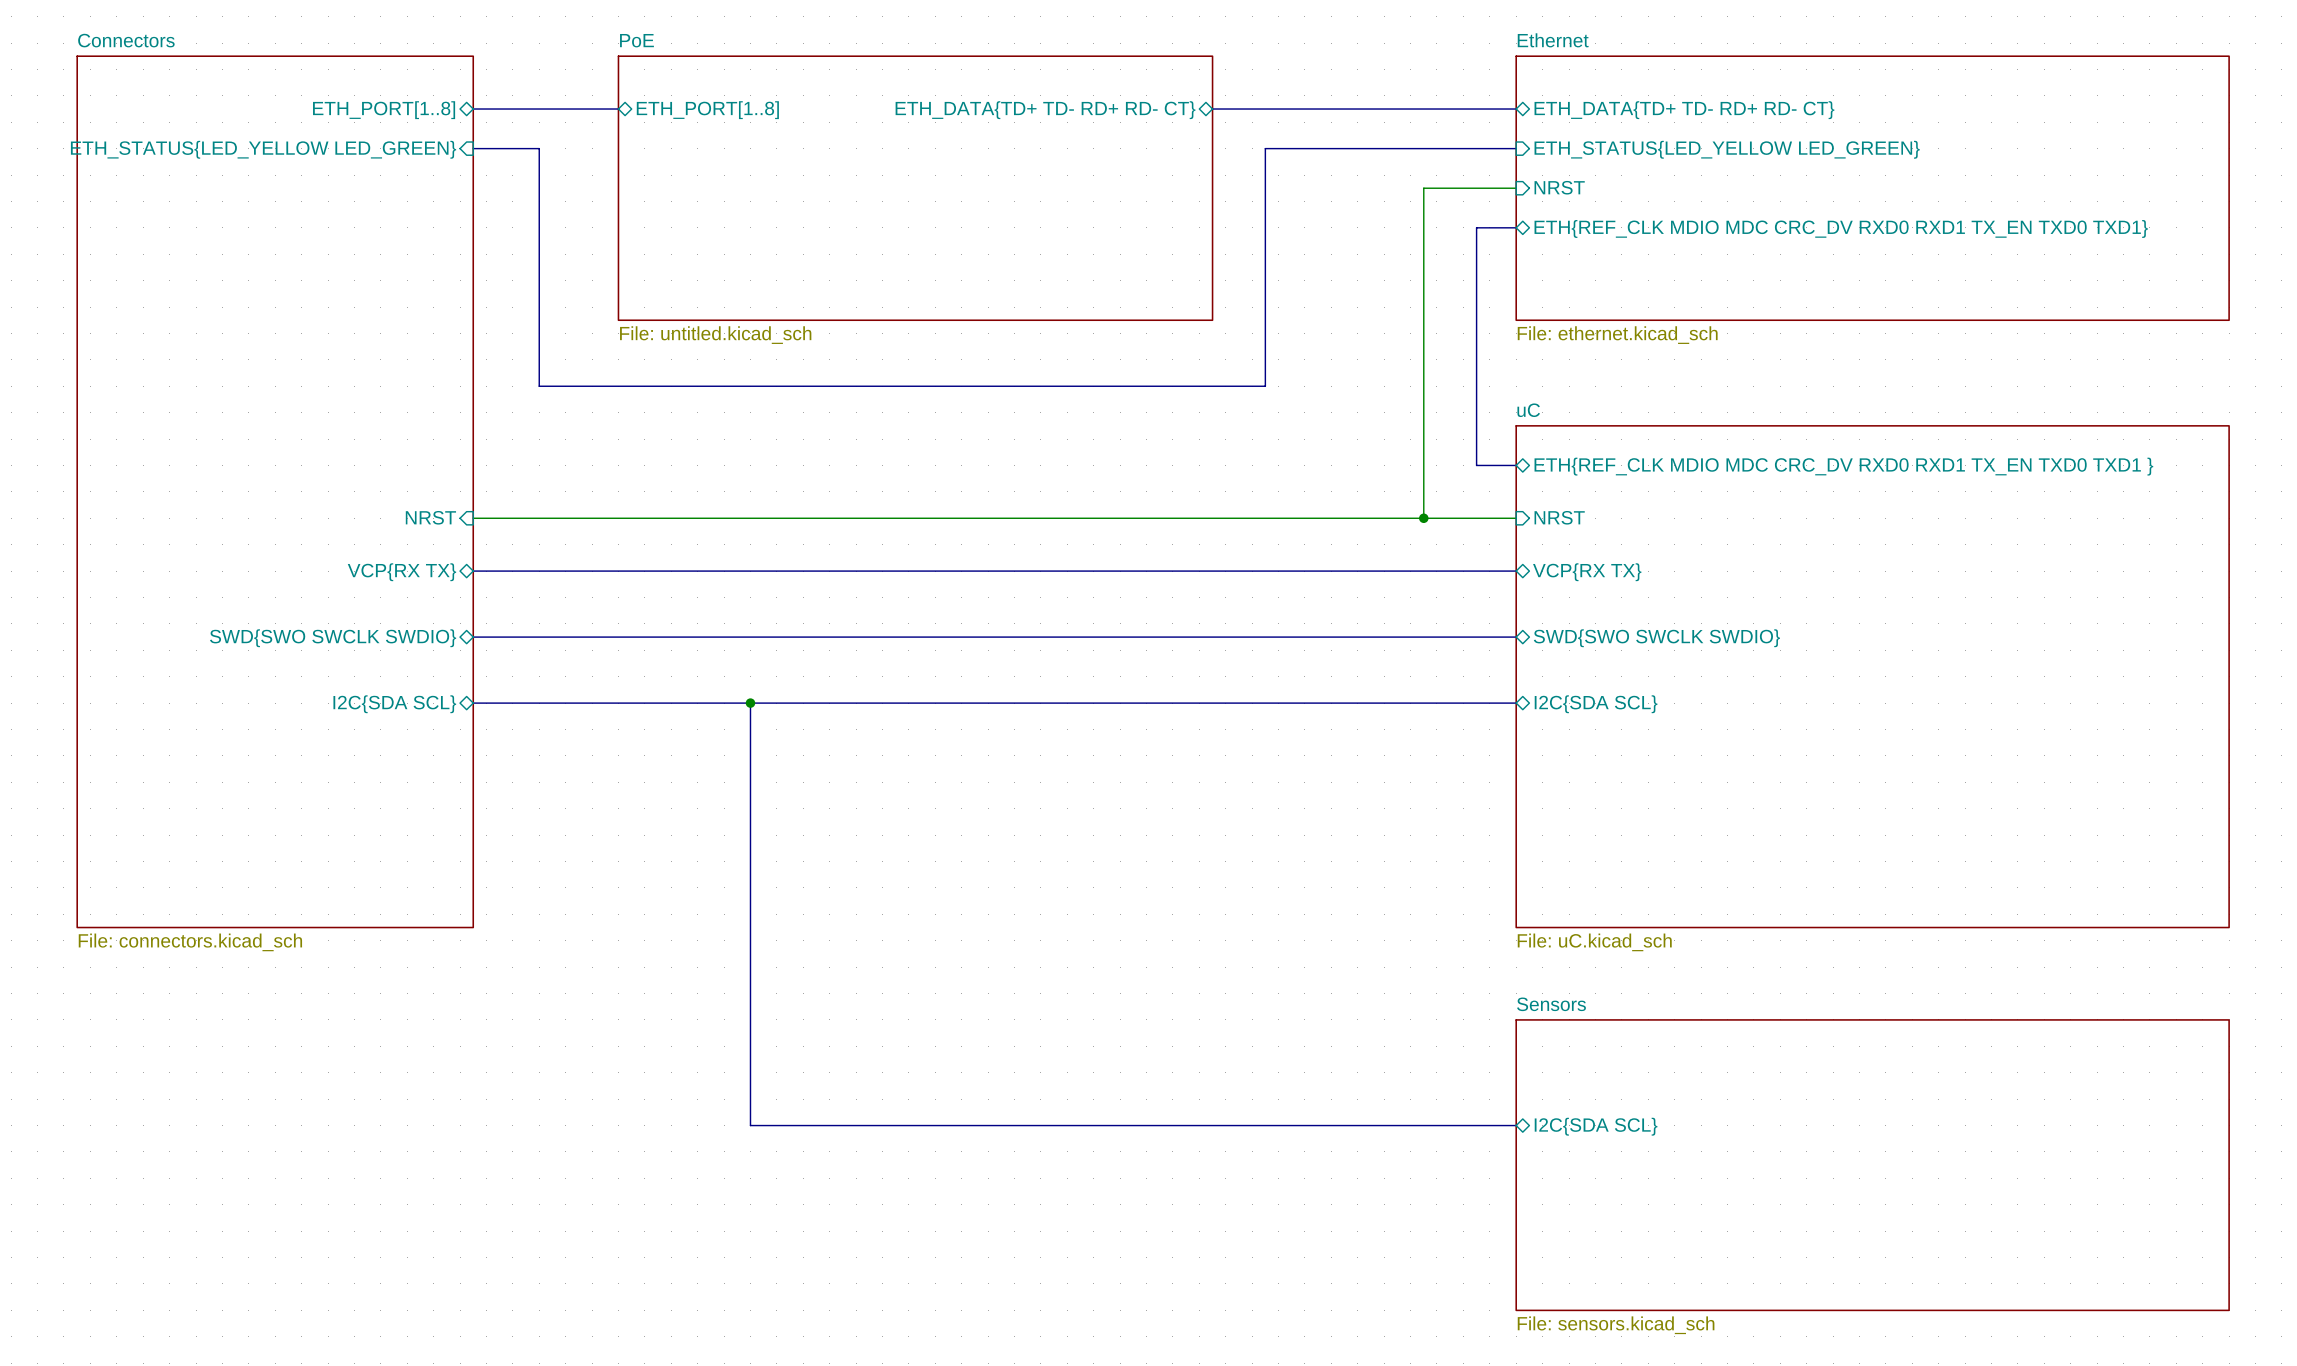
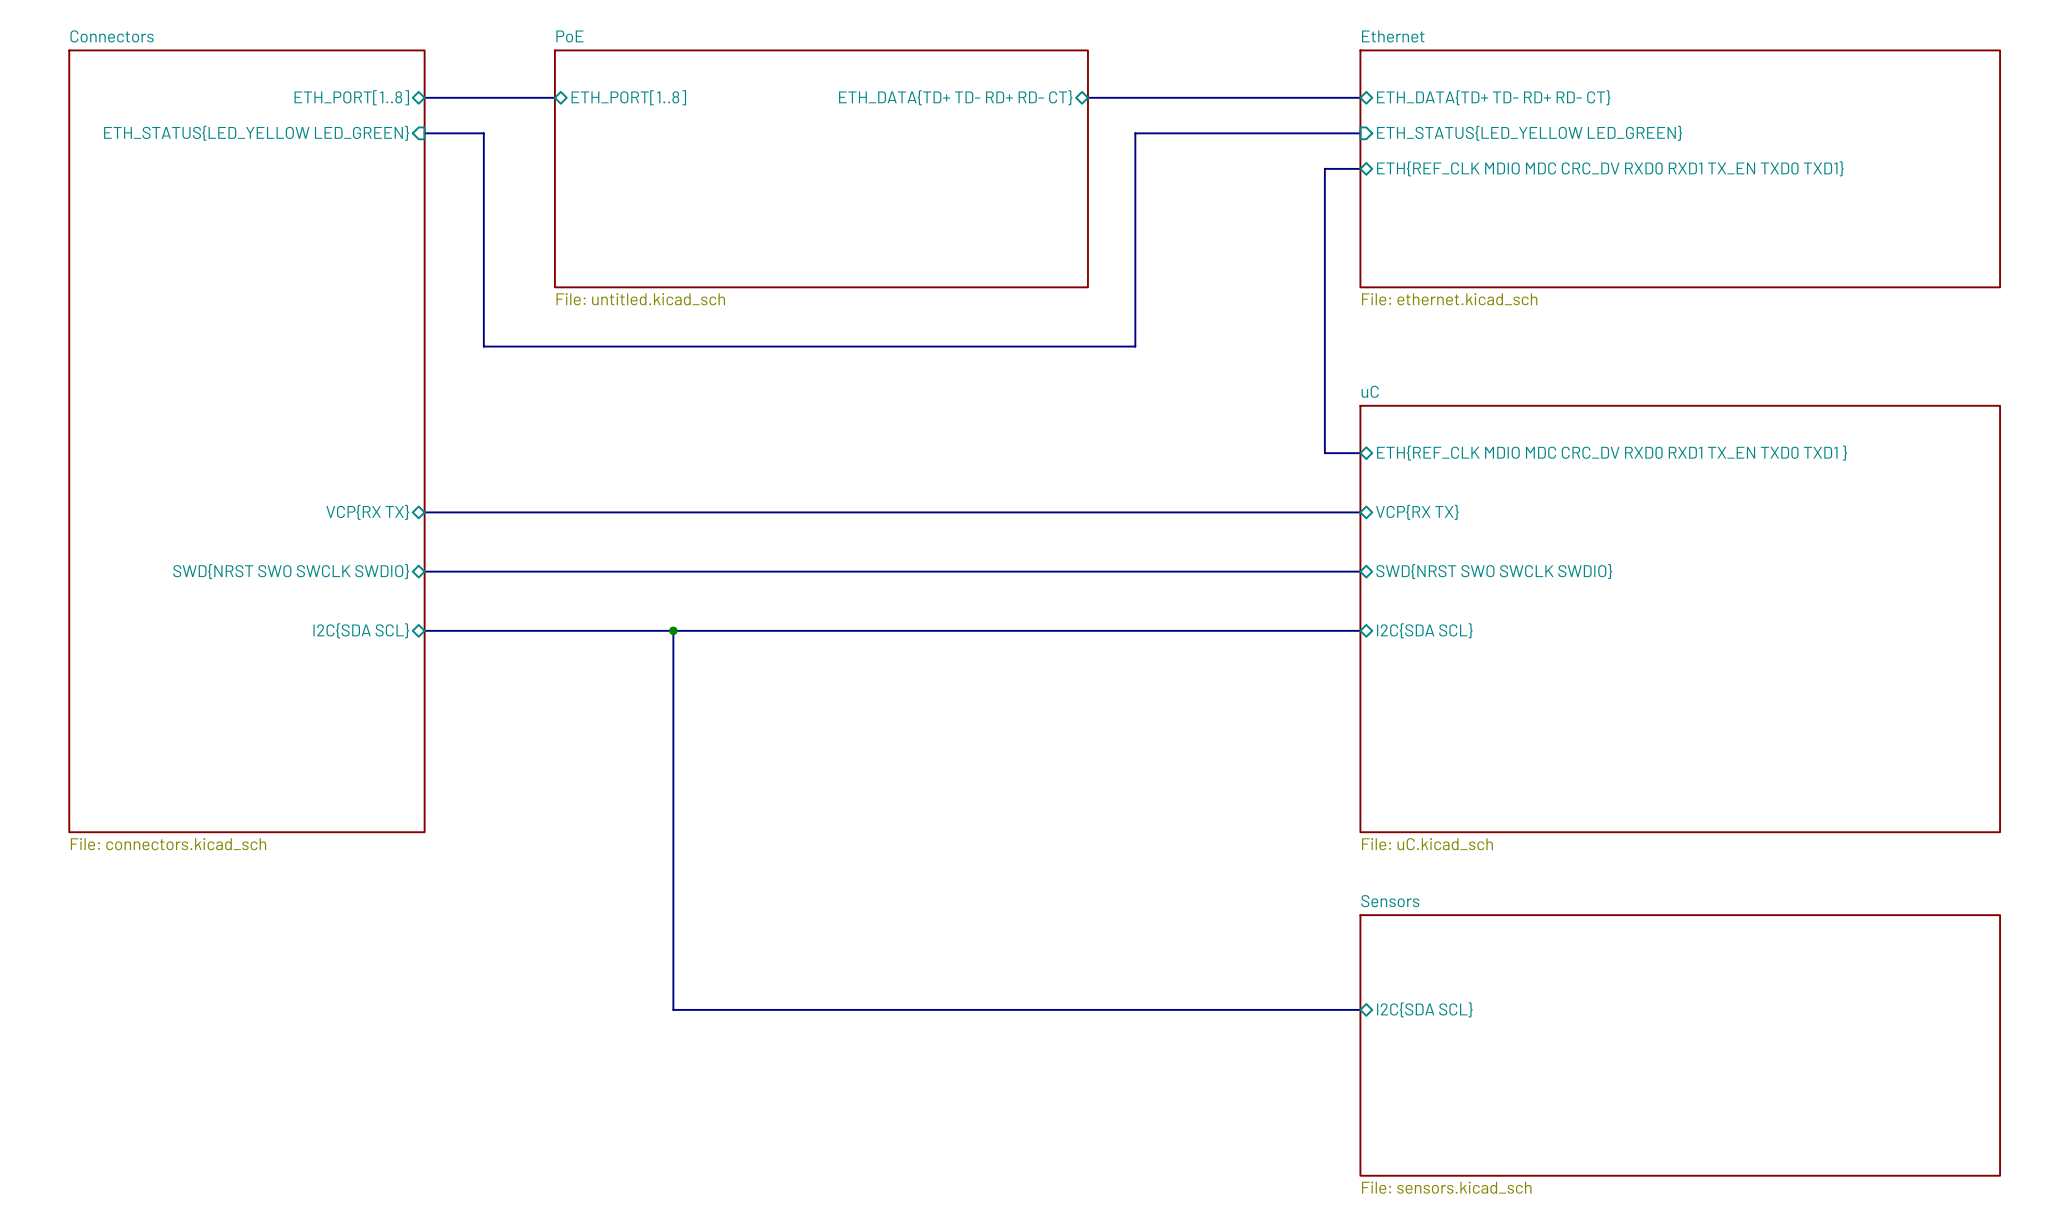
sheet pin shape: input (1559, 187) -> bidirectional (1610, 168)
sheet pin: NRST (1559, 187) -> ETH{REF_CLK MDIO MDC CRC_DV RXD0 RXD1 TX_EN TXD0 TXD1} (1610, 168)
wire: (1516, 188) (1423, 188) (1423, 518) -> none
bus: (1476, 227) (1516, 227) -> (1324, 204) (1324, 168) (1360, 168)
sheet pin: ETH{REF_CLK MDIO MDC CRC_DV RXD0 RXD1 TX_EN TXD0 TXD1} (1841, 228) -> none
bus: (1476, 465) (1516, 465) -> (1324, 417) (1324, 453) (1360, 453)
sheet pin position: ETH{REF_CLK MDIO MDC CRC_DV RXD0 RXD1 TX_EN TXD0 TXD1 } (1843, 466) -> ETH{REF_CLK MDIO MDC CRC_DV RXD0 RXD1 TX_EN TXD0 TXD1 } (1612, 453)
sheet pin: NRST (430, 517) -> none
sheet pin: NRST (1559, 517) -> none
wire: (473, 518) (1516, 518) -> none
junction: (1423, 518) -> none
sheet pin: SWD{SWO SWCLK SWDIO} (333, 638) -> SWD{NRST SWO SWCLK SWDIO} (291, 571)
sheet pin: SWD{SWO SWCLK SWDIO} (1656, 638) -> SWD{NRST SWO SWCLK SWDIO} (1494, 571)
sheet uC: File: uC.kicad_sch (1872, 676) -> none
sheet uC: none -> File: uC.kicad_sch (1680, 619)

